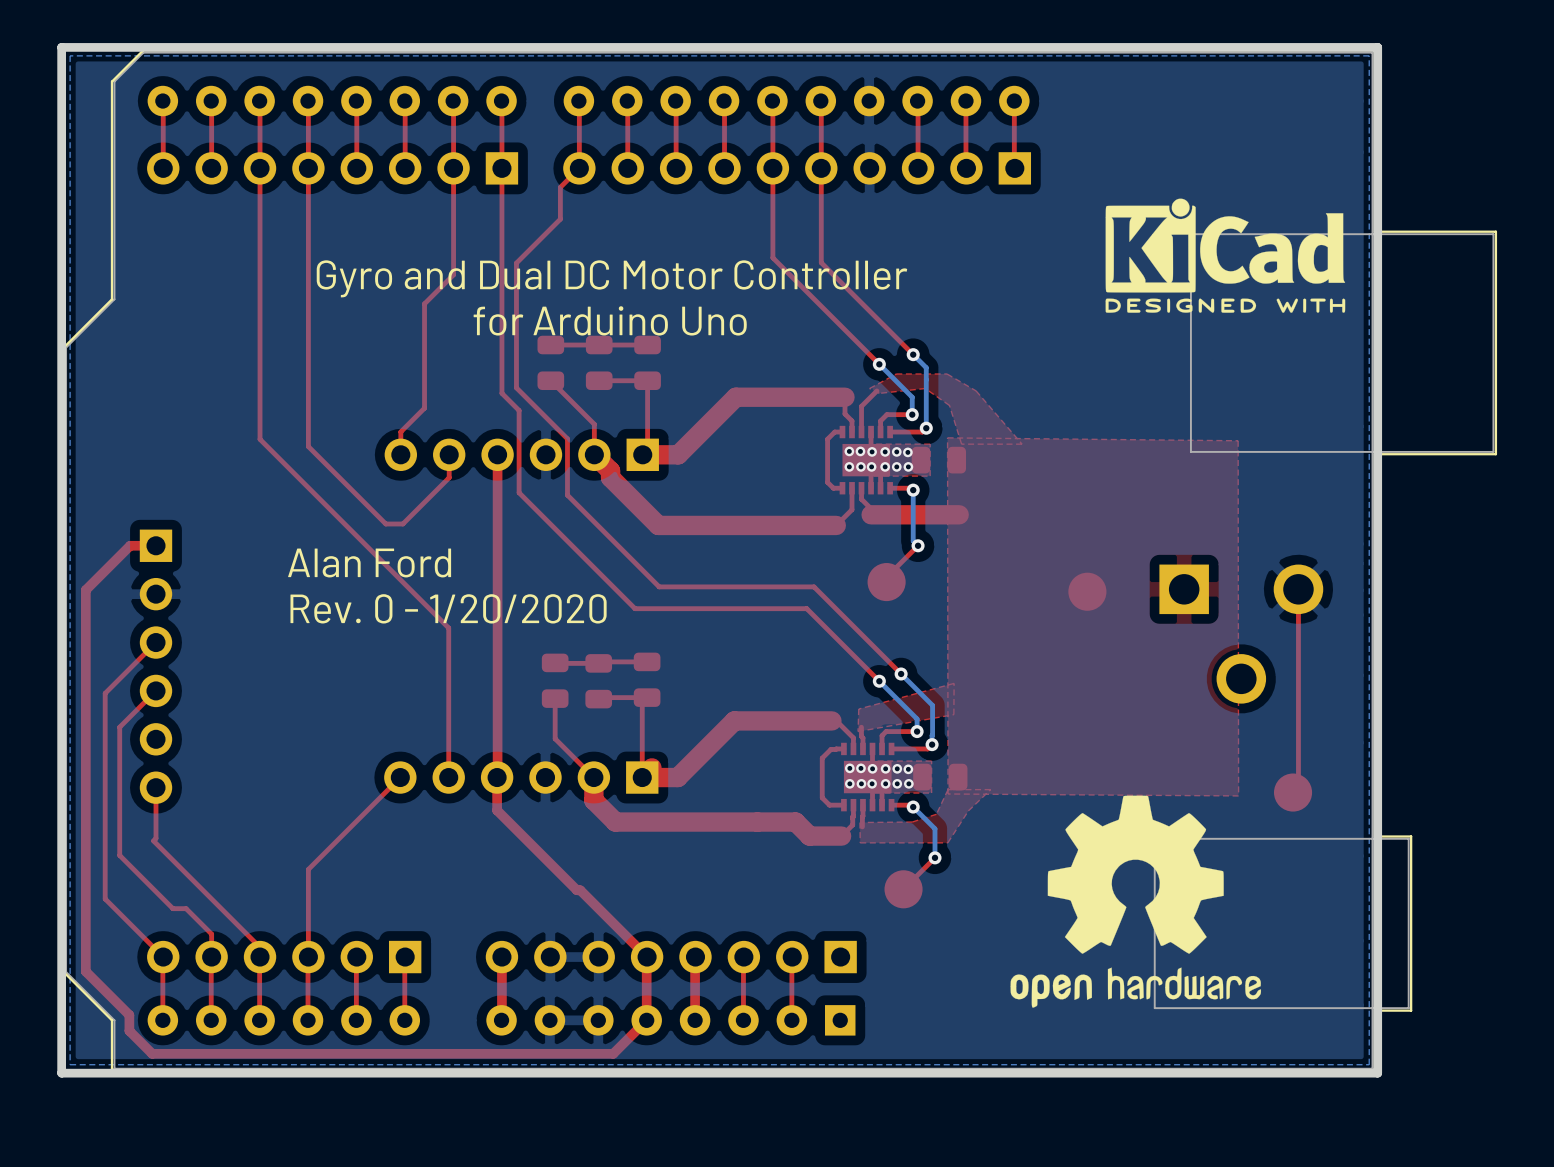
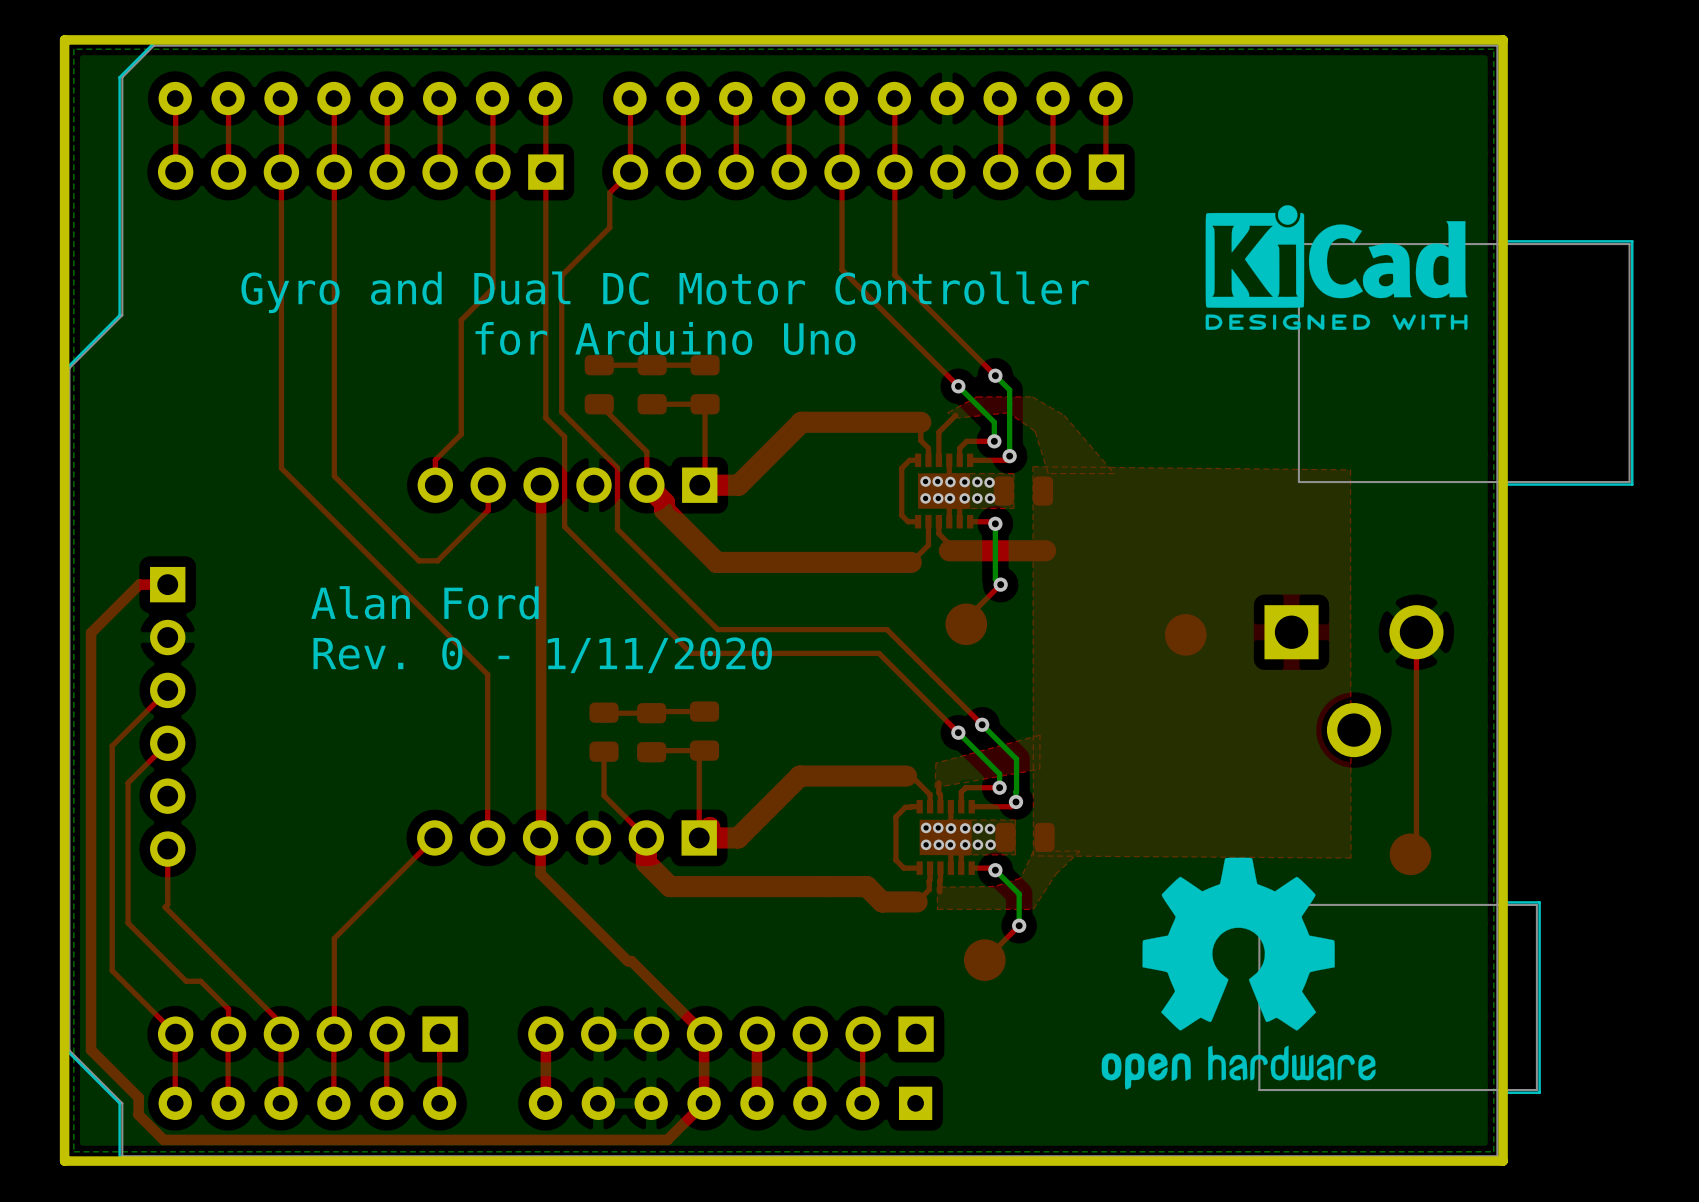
text: Rev. 0 - 1/20/2020 (448, 608) -> Rev. 0 - 1/11/2020 (542, 655)

